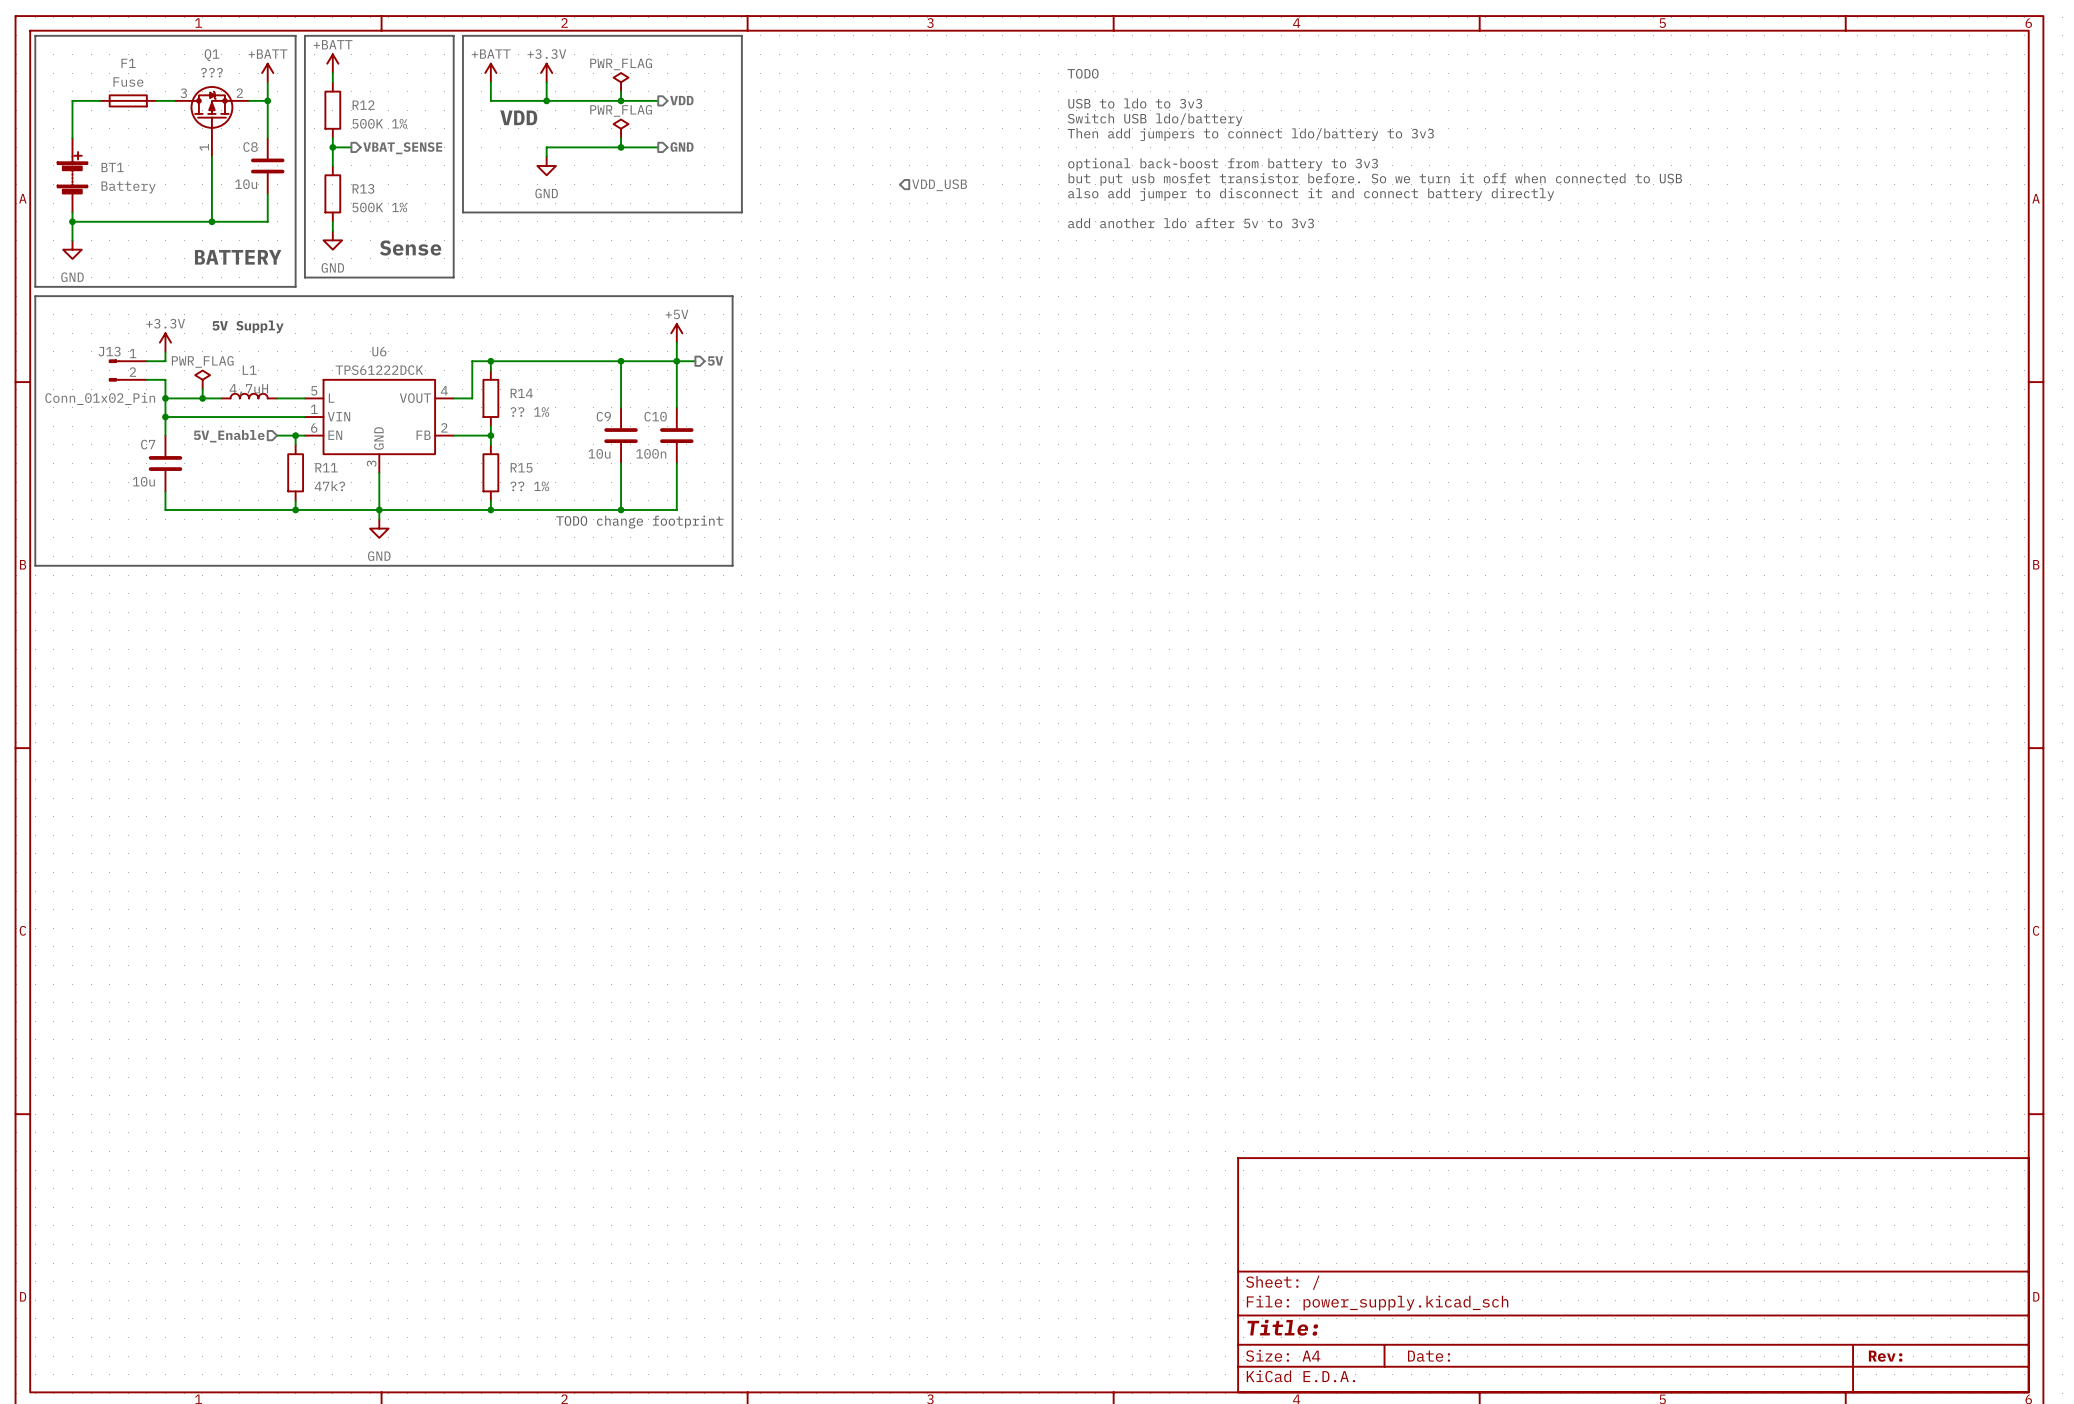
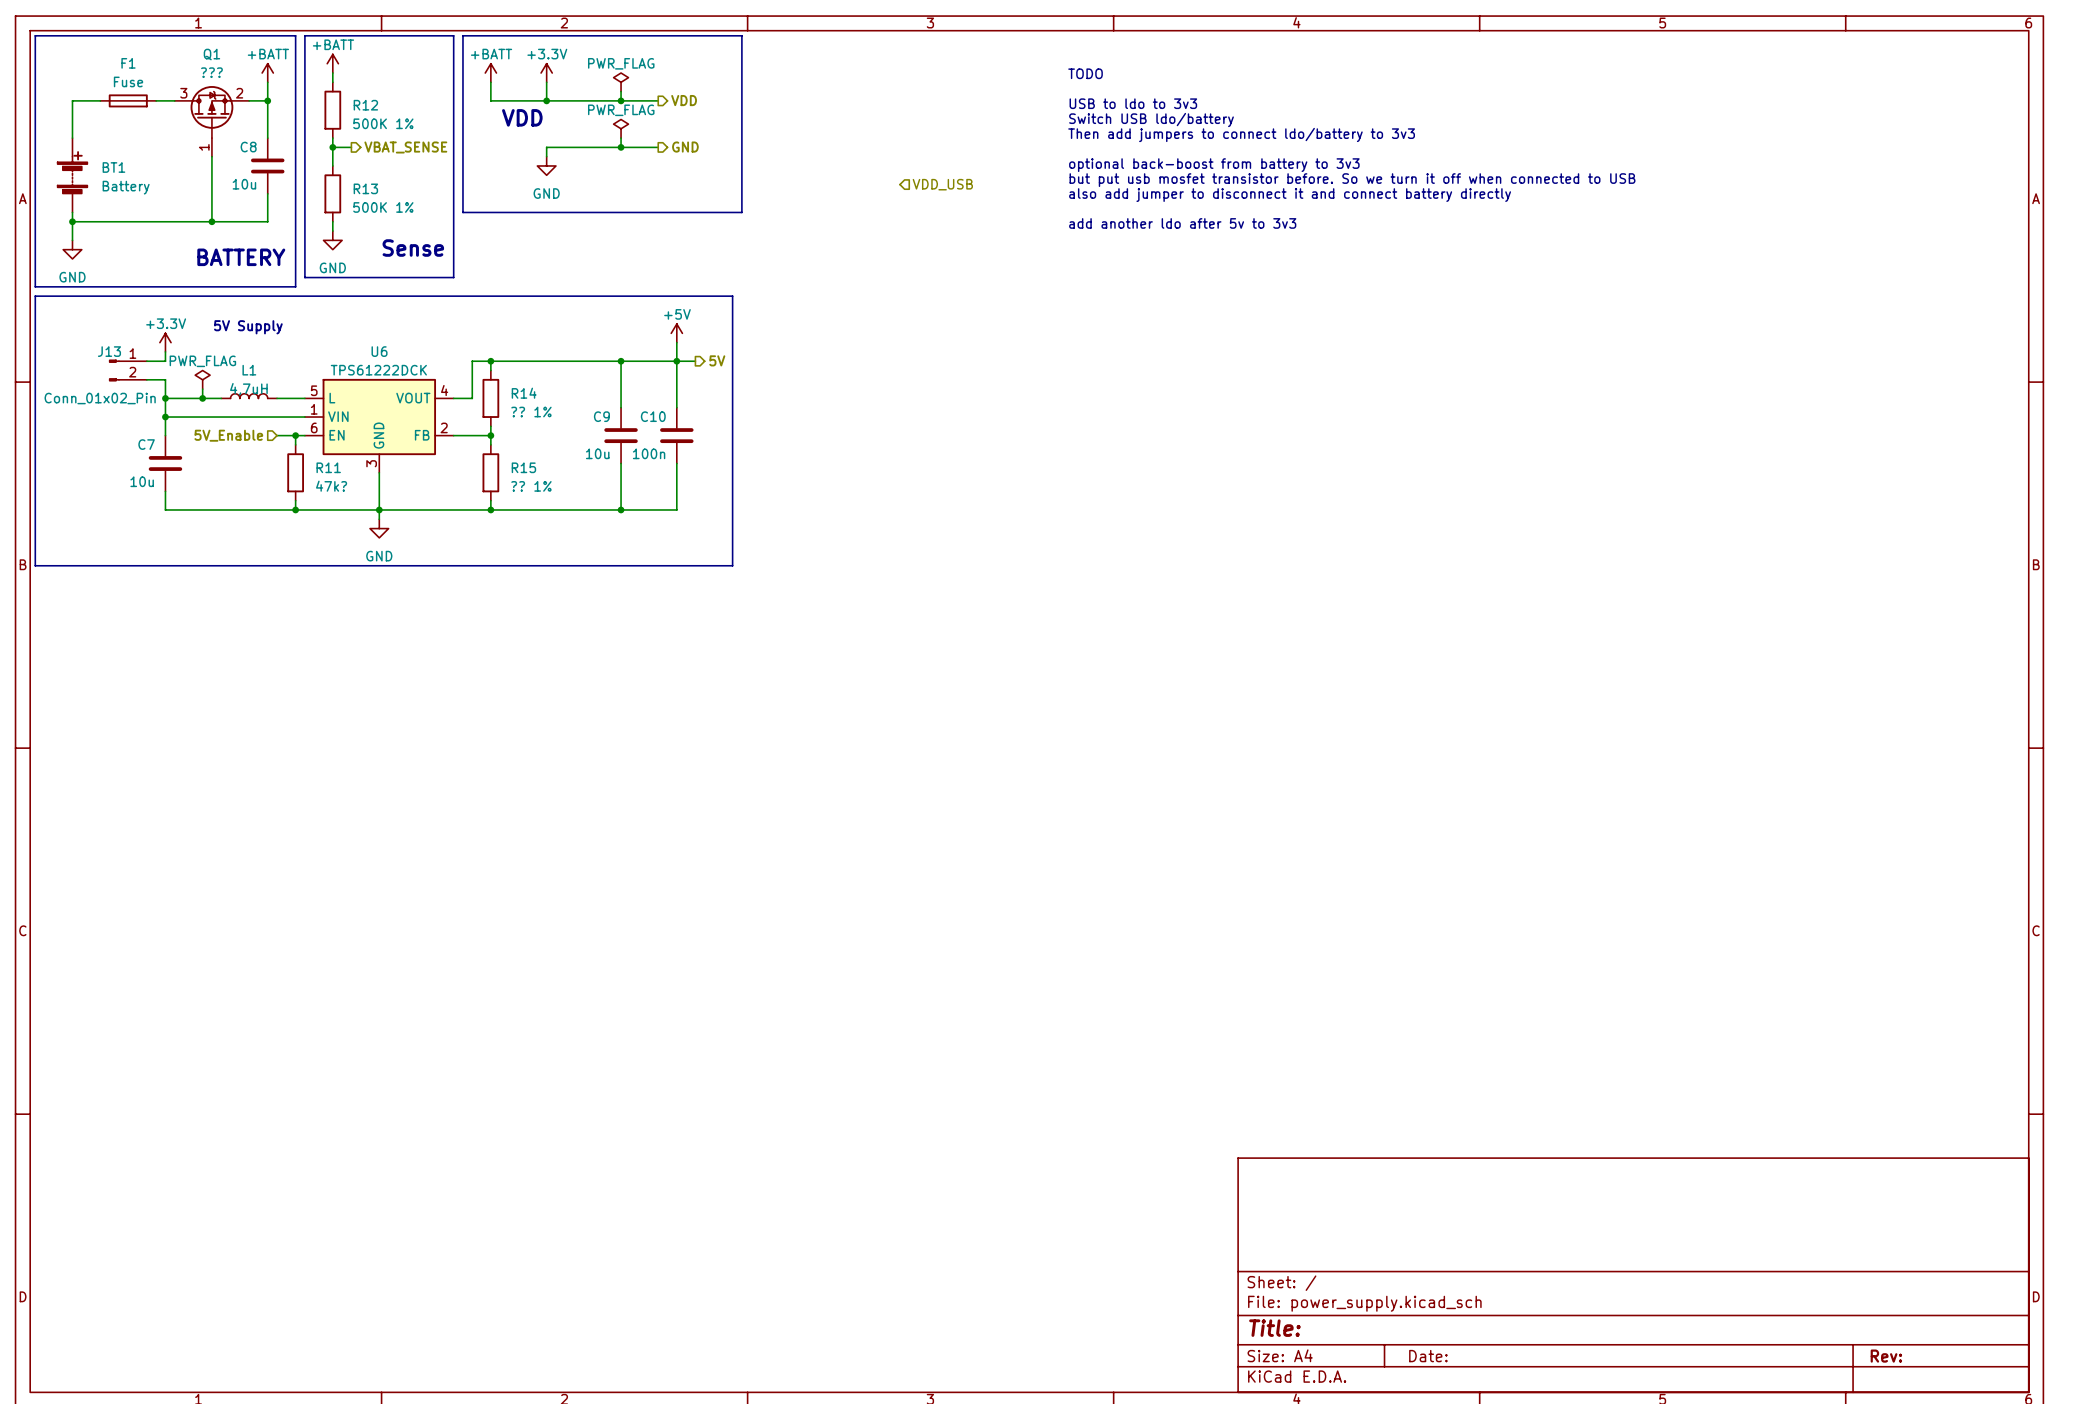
text: TODO change footprint (639, 522) -> none

